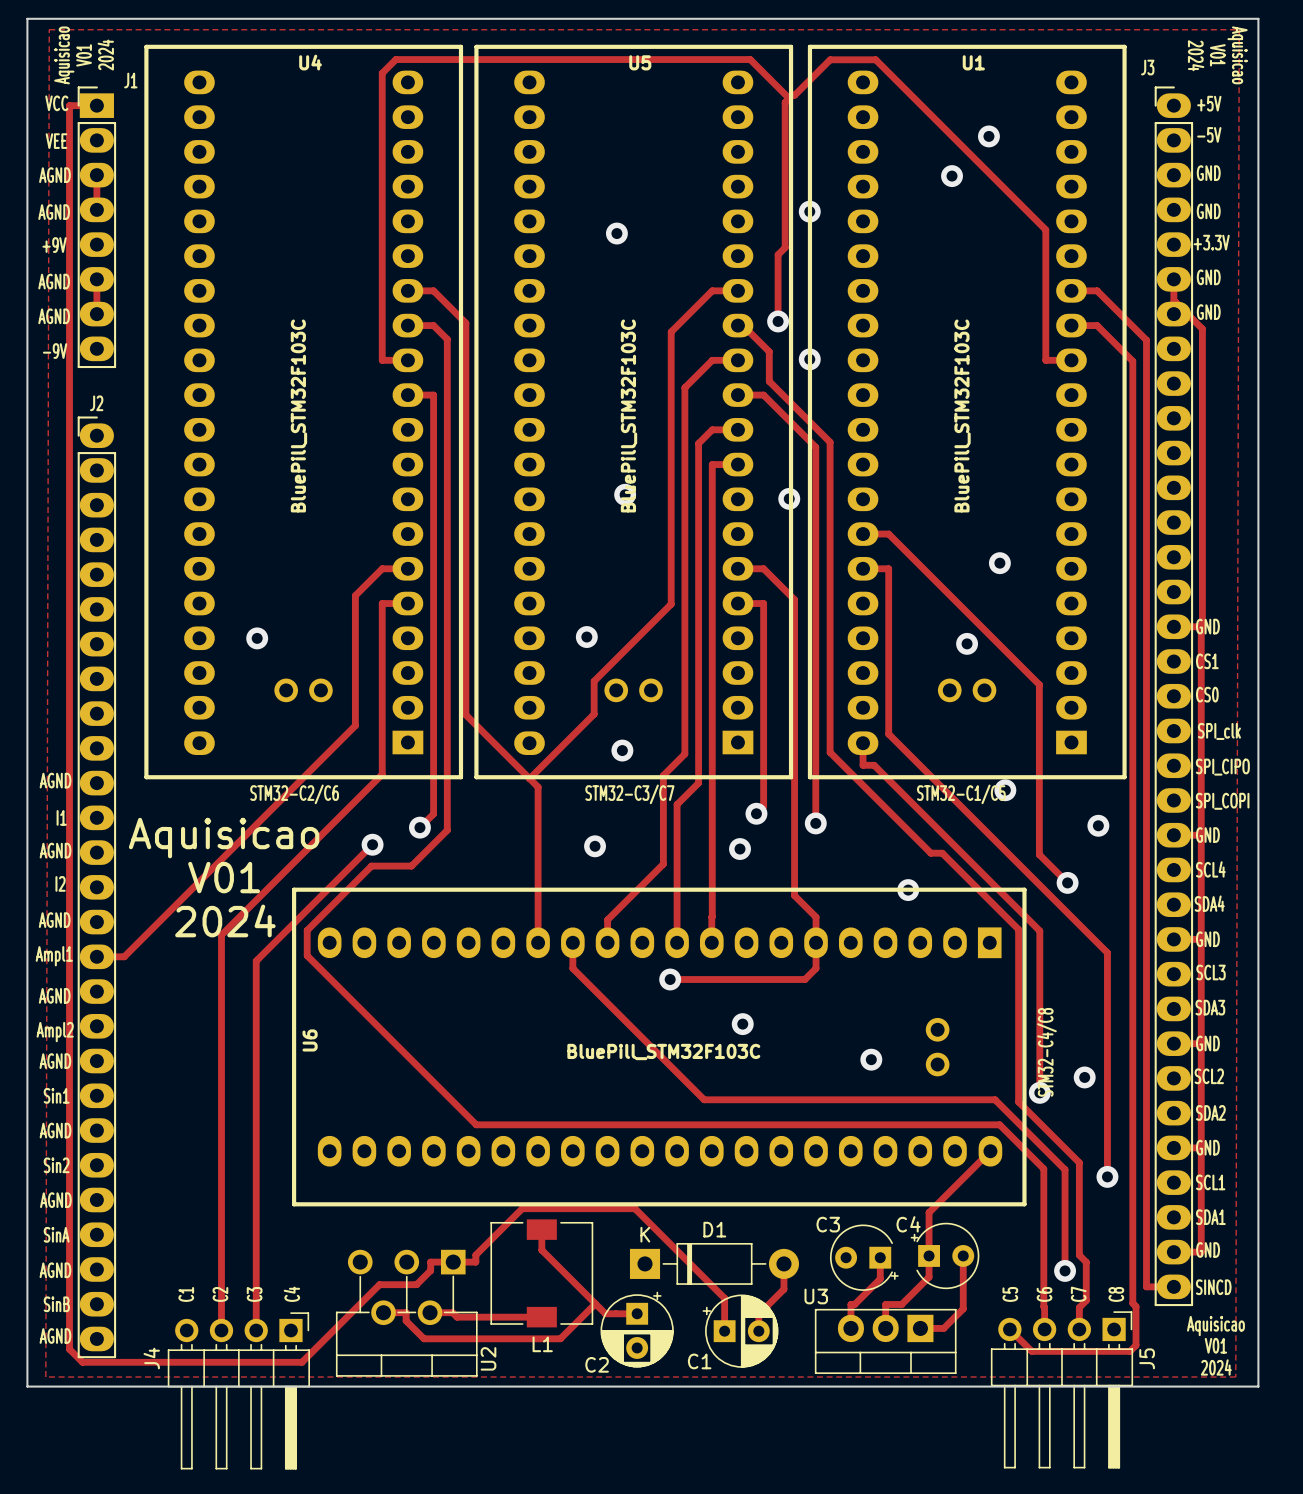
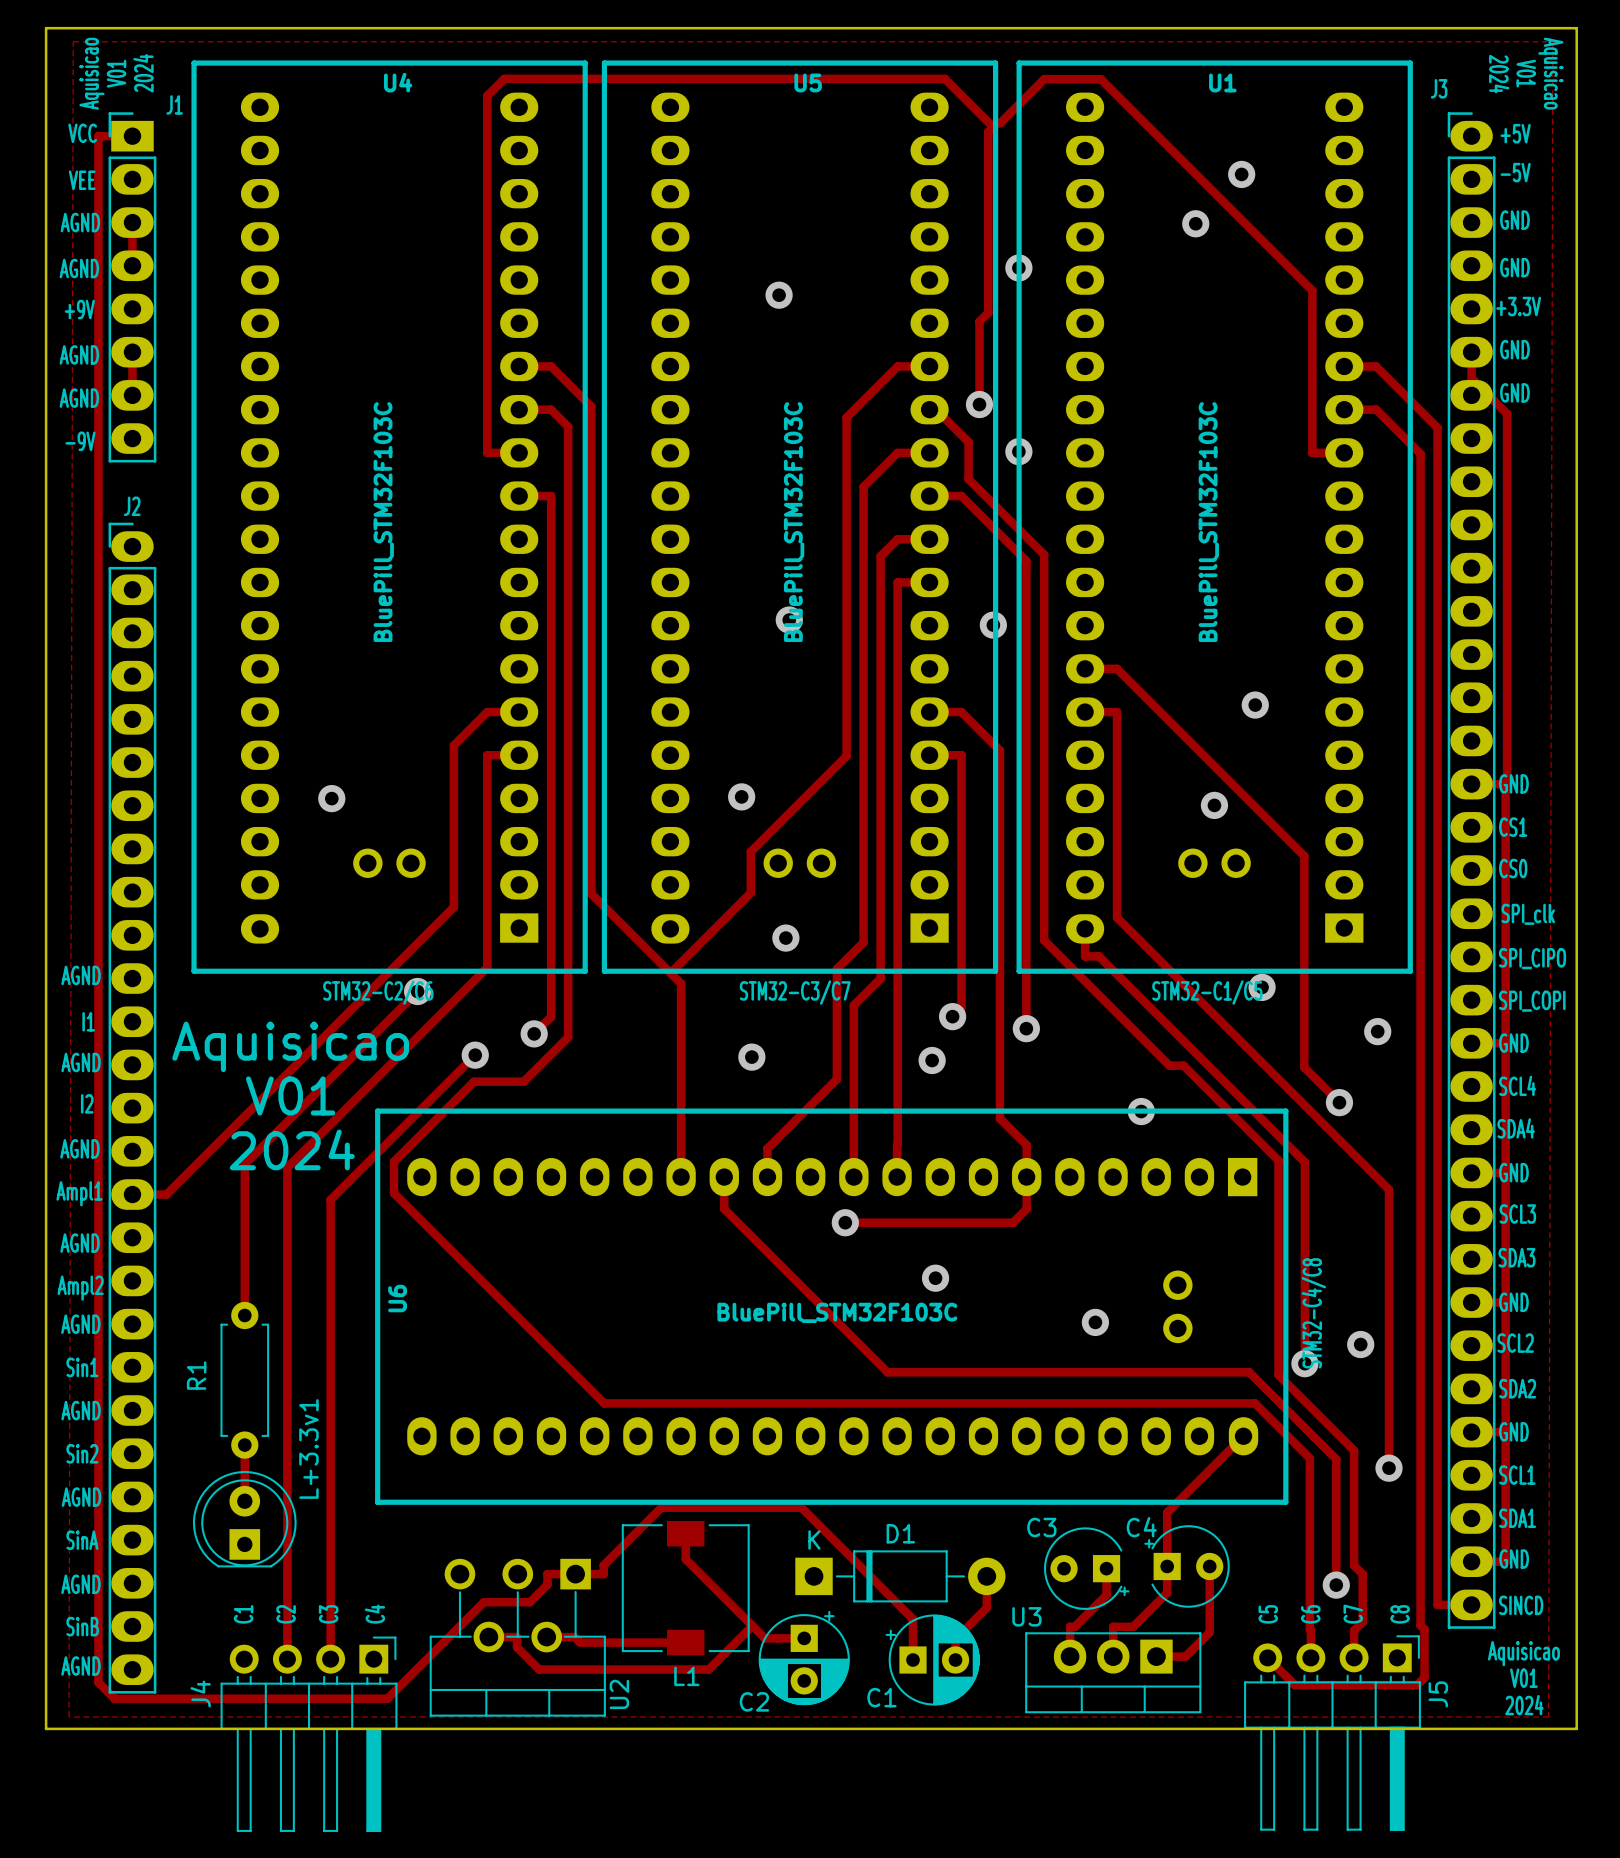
track: none -> (417, 991) (244, 1164) (244, 1315)
via: none -> (417, 991)
R1: none -> (244, 1380)
track: none -> (244, 1445) (244, 1501)
L+3.3v1: none -> (244, 1519)

